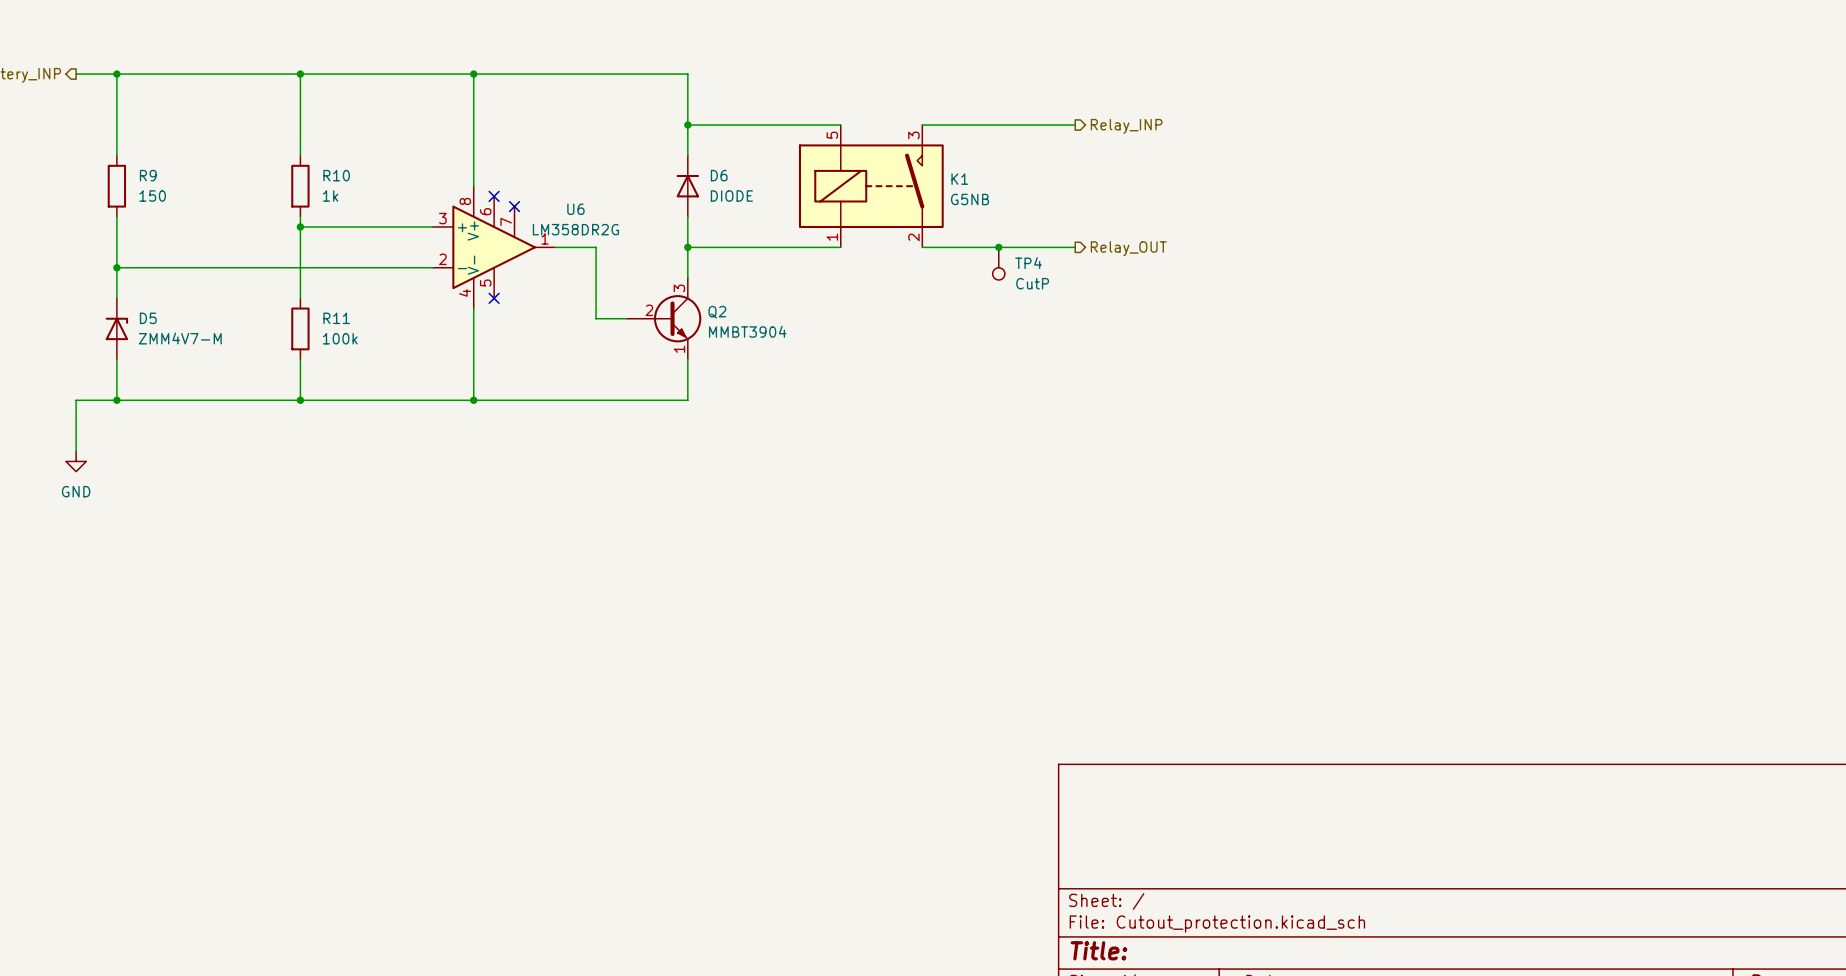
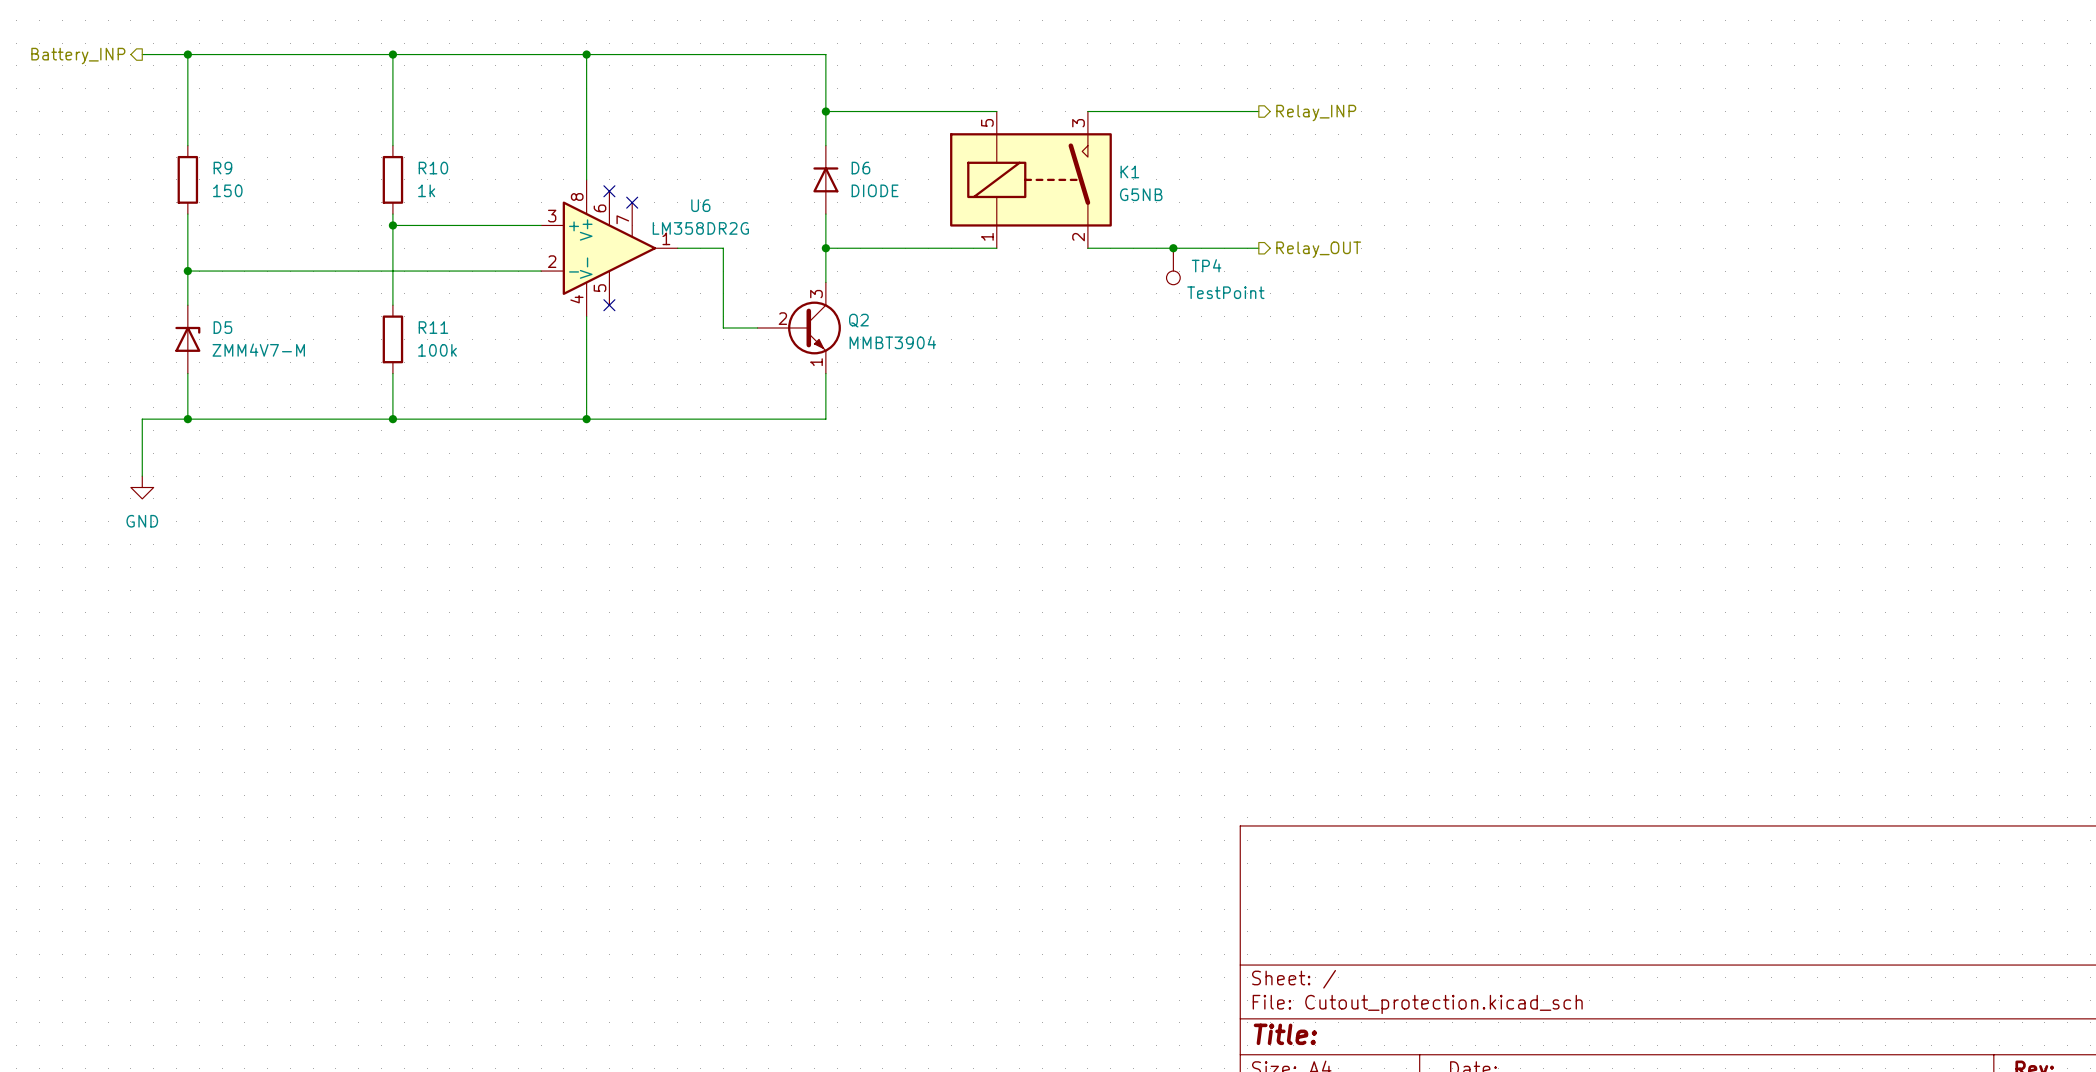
TP4 value: CutP (1032, 283) -> TestPoint (1225, 292)

